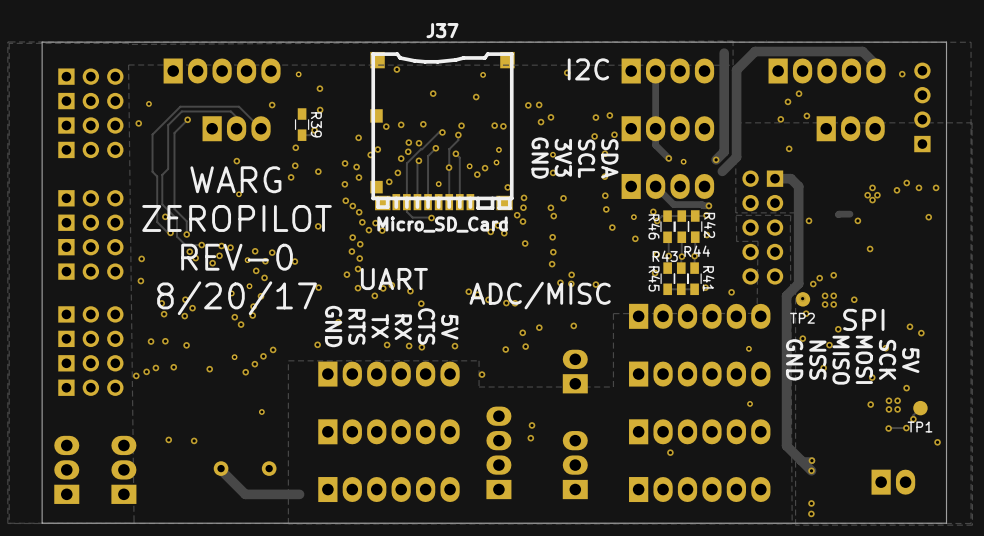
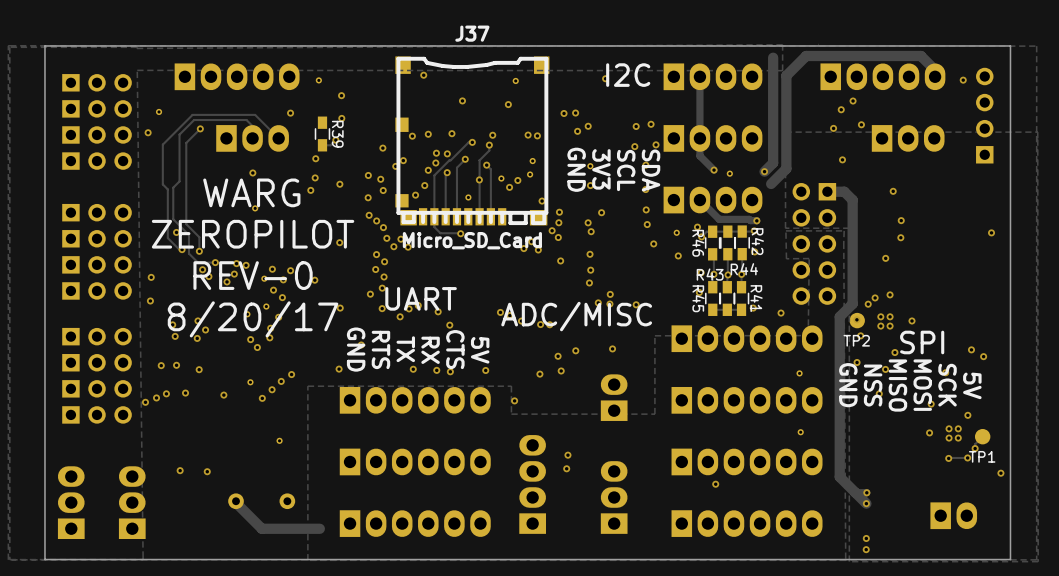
via: none -> (893, 191)
via: (906, 182) -> none
via: (872, 187) -> none
via: (918, 187) -> none
via: (936, 187) -> none
via: (896, 190) -> none
via: (867, 195) -> none
via: (877, 195) -> none
via: (872, 200) -> none
via: none -> (901, 220)
track: (850, 214) (838, 214) -> none
via: (809, 220) -> none
via: (857, 220) -> none
via: none -> (900, 237)
via: none -> (885, 258)
via: (870, 248) -> none

